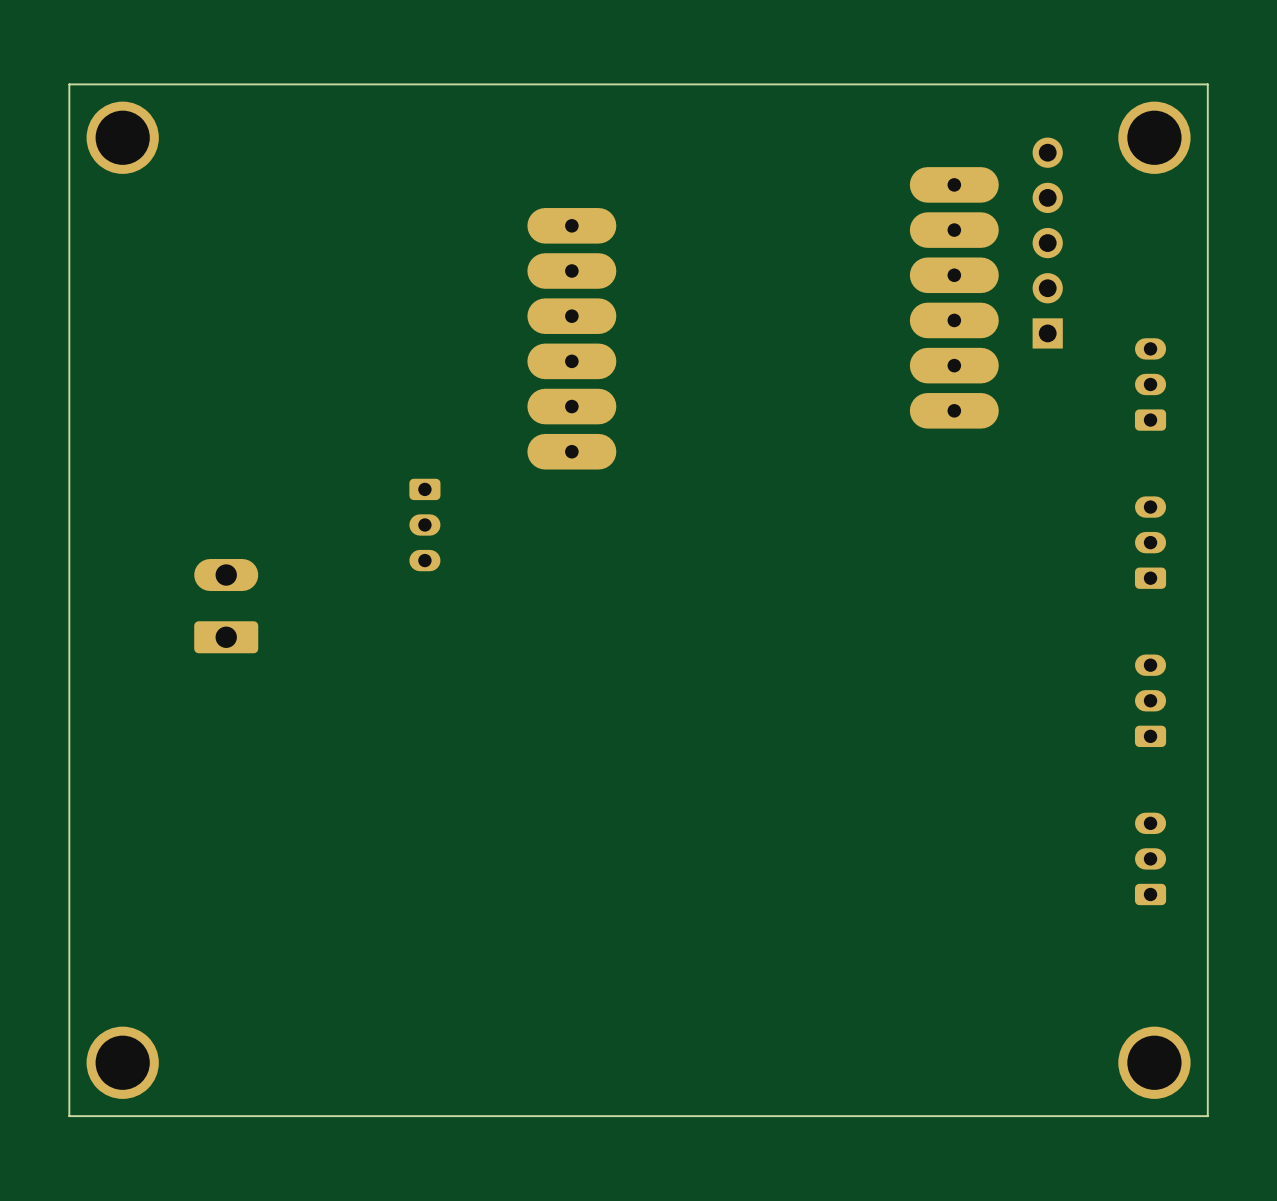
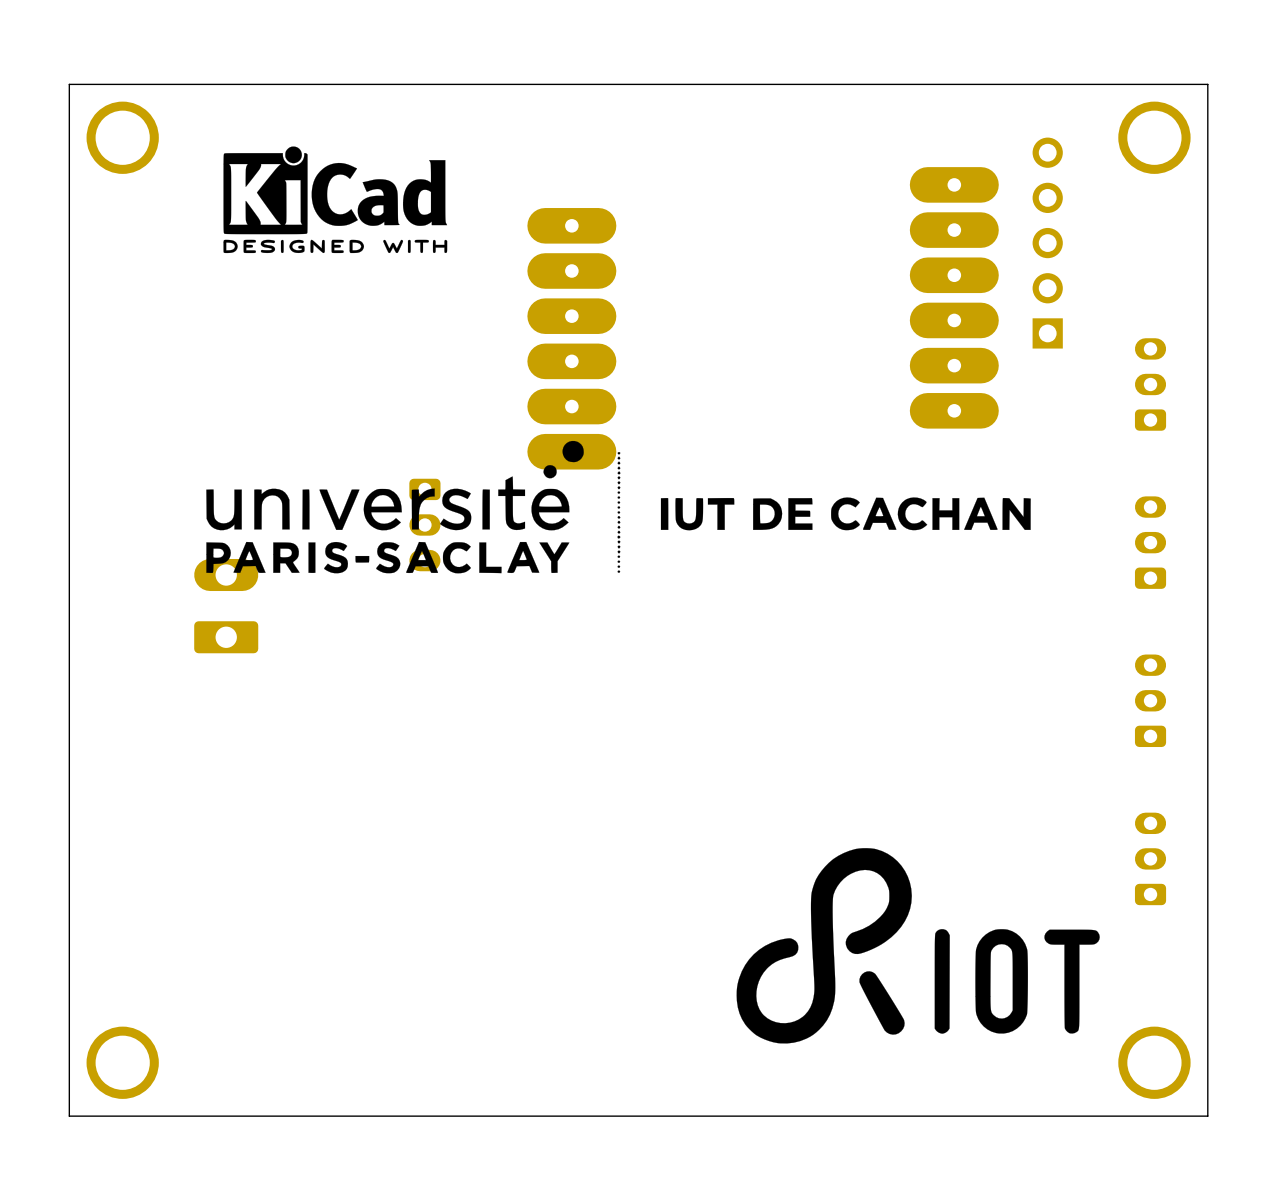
drawing: none -> [223, 146, 448, 254]
drawing: none -> [206, 440, 1031, 574]
drawing: none -> [736, 848, 1100, 1044]

